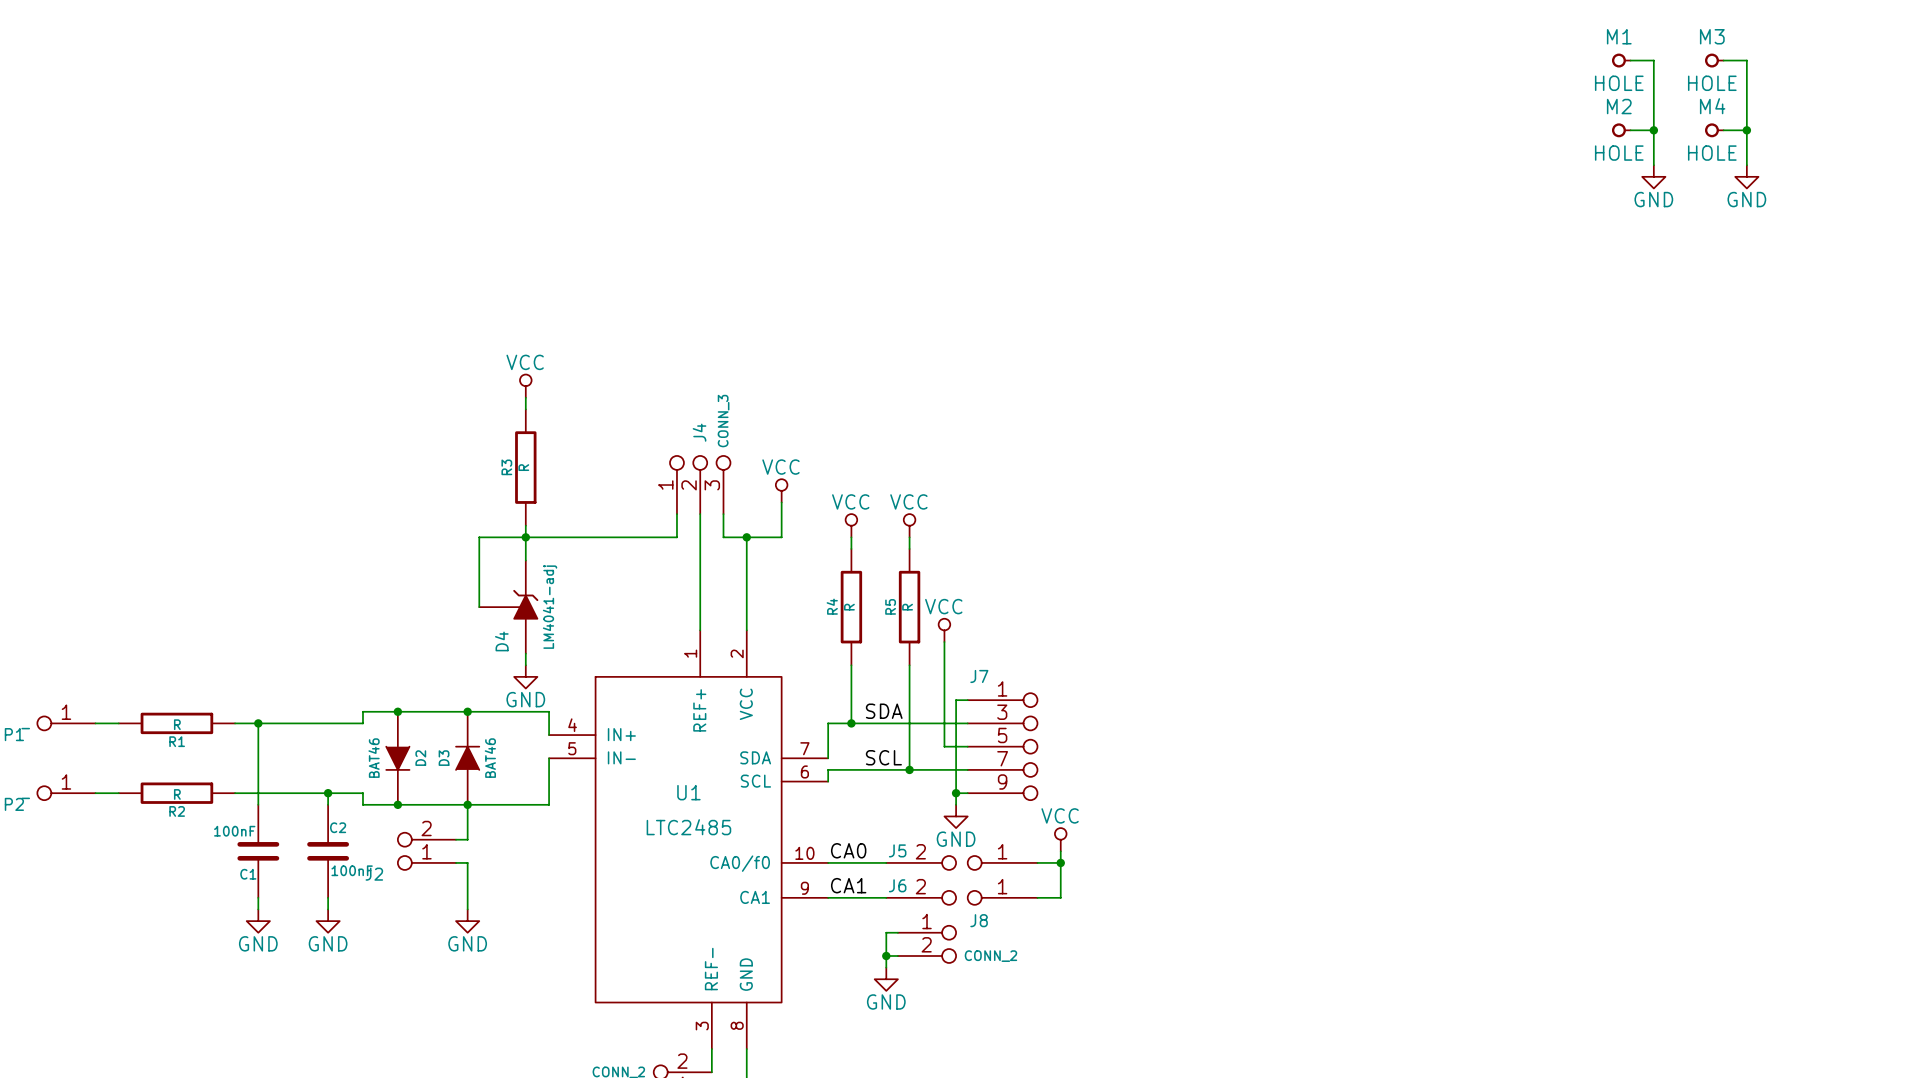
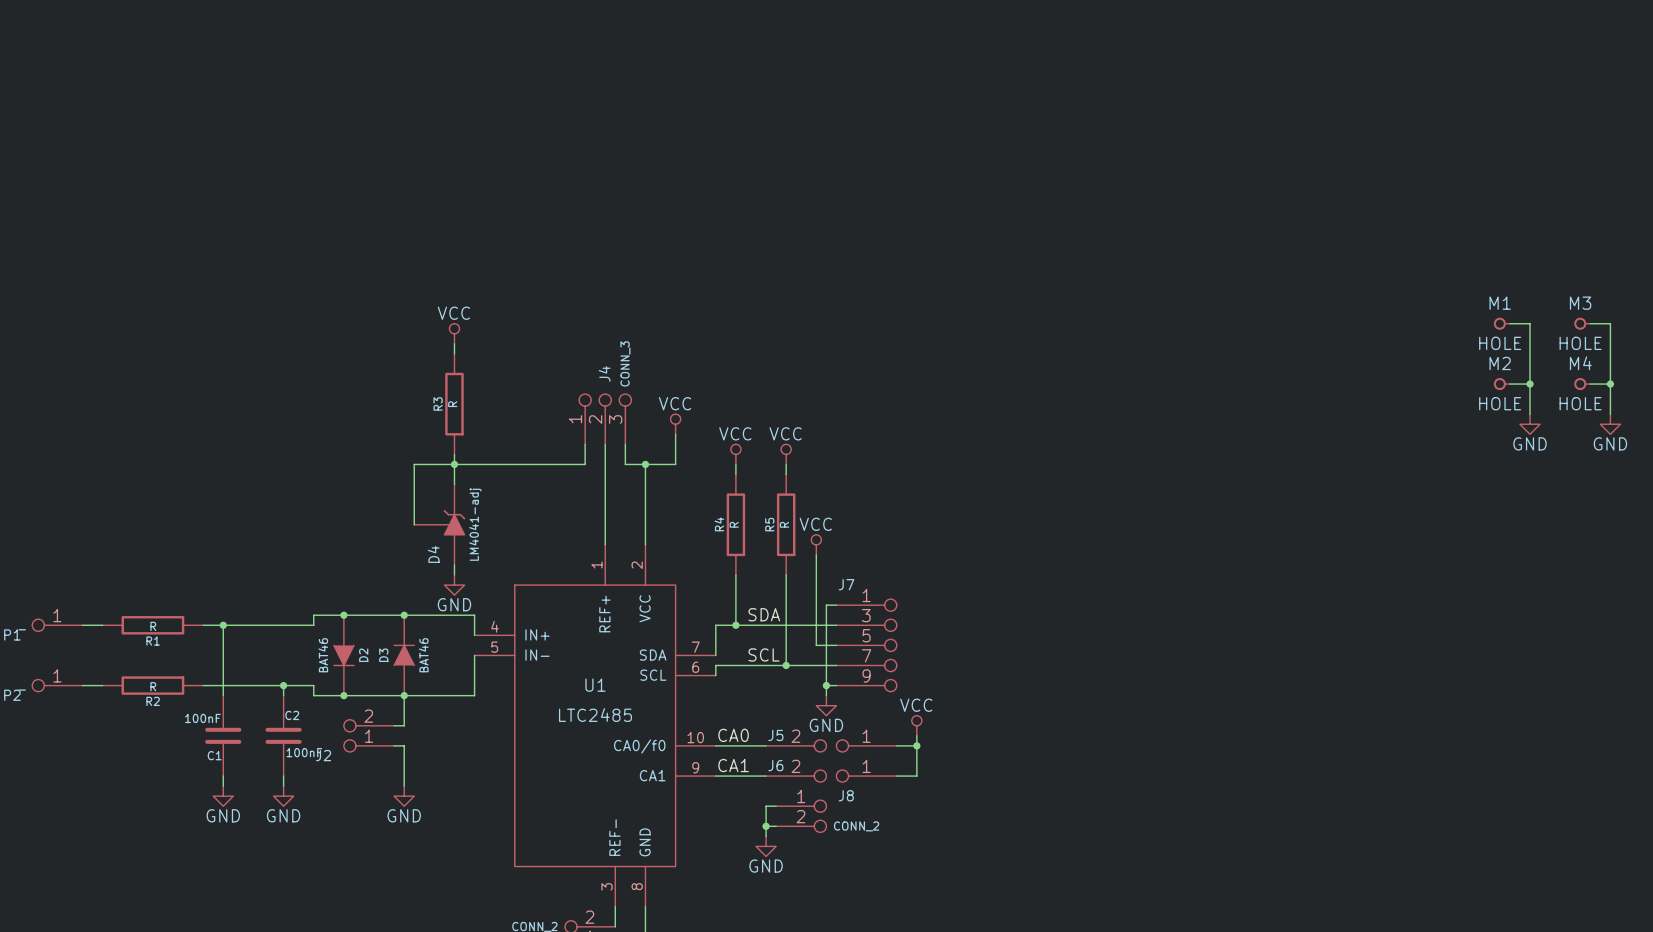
M1 position: (1621, 60) -> (1501, 323)
wire: (1630, 60) (1653, 60) (1653, 165) -> none
M3 position: (1714, 60) -> (1582, 323)
wire: (1723, 60) (1746, 60) (1746, 165) -> none
M2 position: (1621, 130) -> (1501, 384)
wire: (1630, 130) (1653, 130) -> none
junction: (1653, 130) -> none
M4 position: (1714, 130) -> (1582, 384)
wire: (1723, 130) (1746, 130) -> none
junction: (1746, 130) -> none
power symbol: GND (1653, 176) -> none
power symbol: GND (1746, 176) -> none
wire: none -> (1509, 323) (1530, 323) (1530, 414)
wire: none -> (1590, 323) (1610, 323) (1610, 414)
wire: none -> (1509, 384) (1530, 384)
junction: none -> (1530, 384)
wire: none -> (1590, 384) (1610, 384)
junction: none -> (1610, 384)
power symbol: none -> GND (1530, 424)
power symbol: none -> GND (1610, 424)

